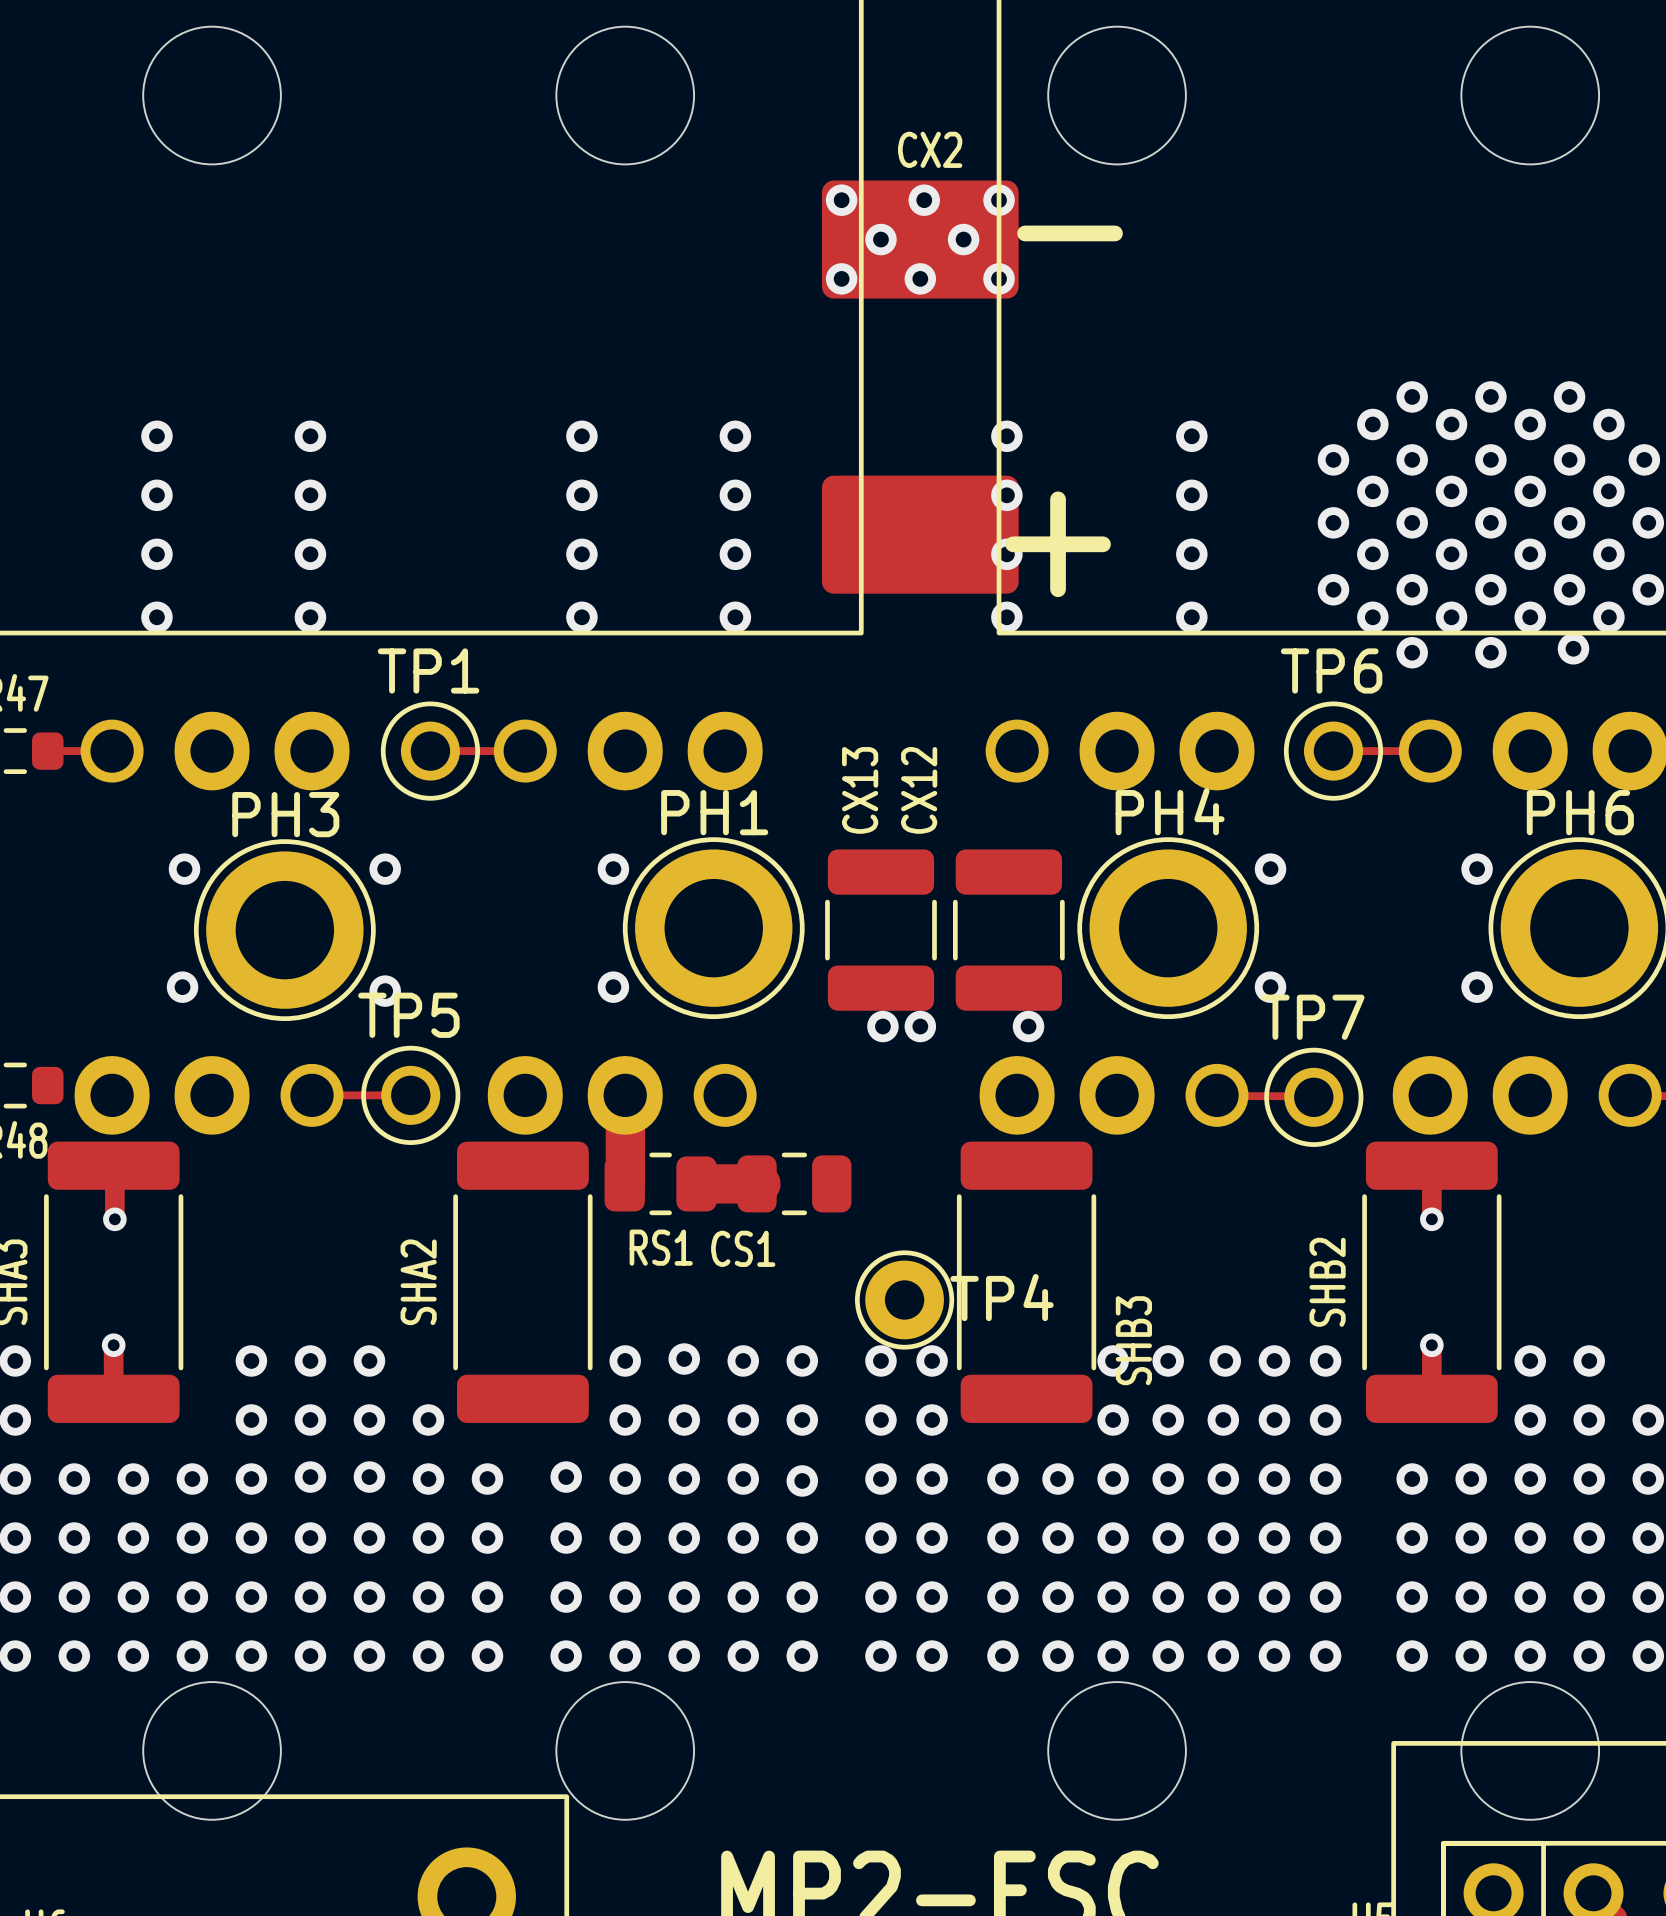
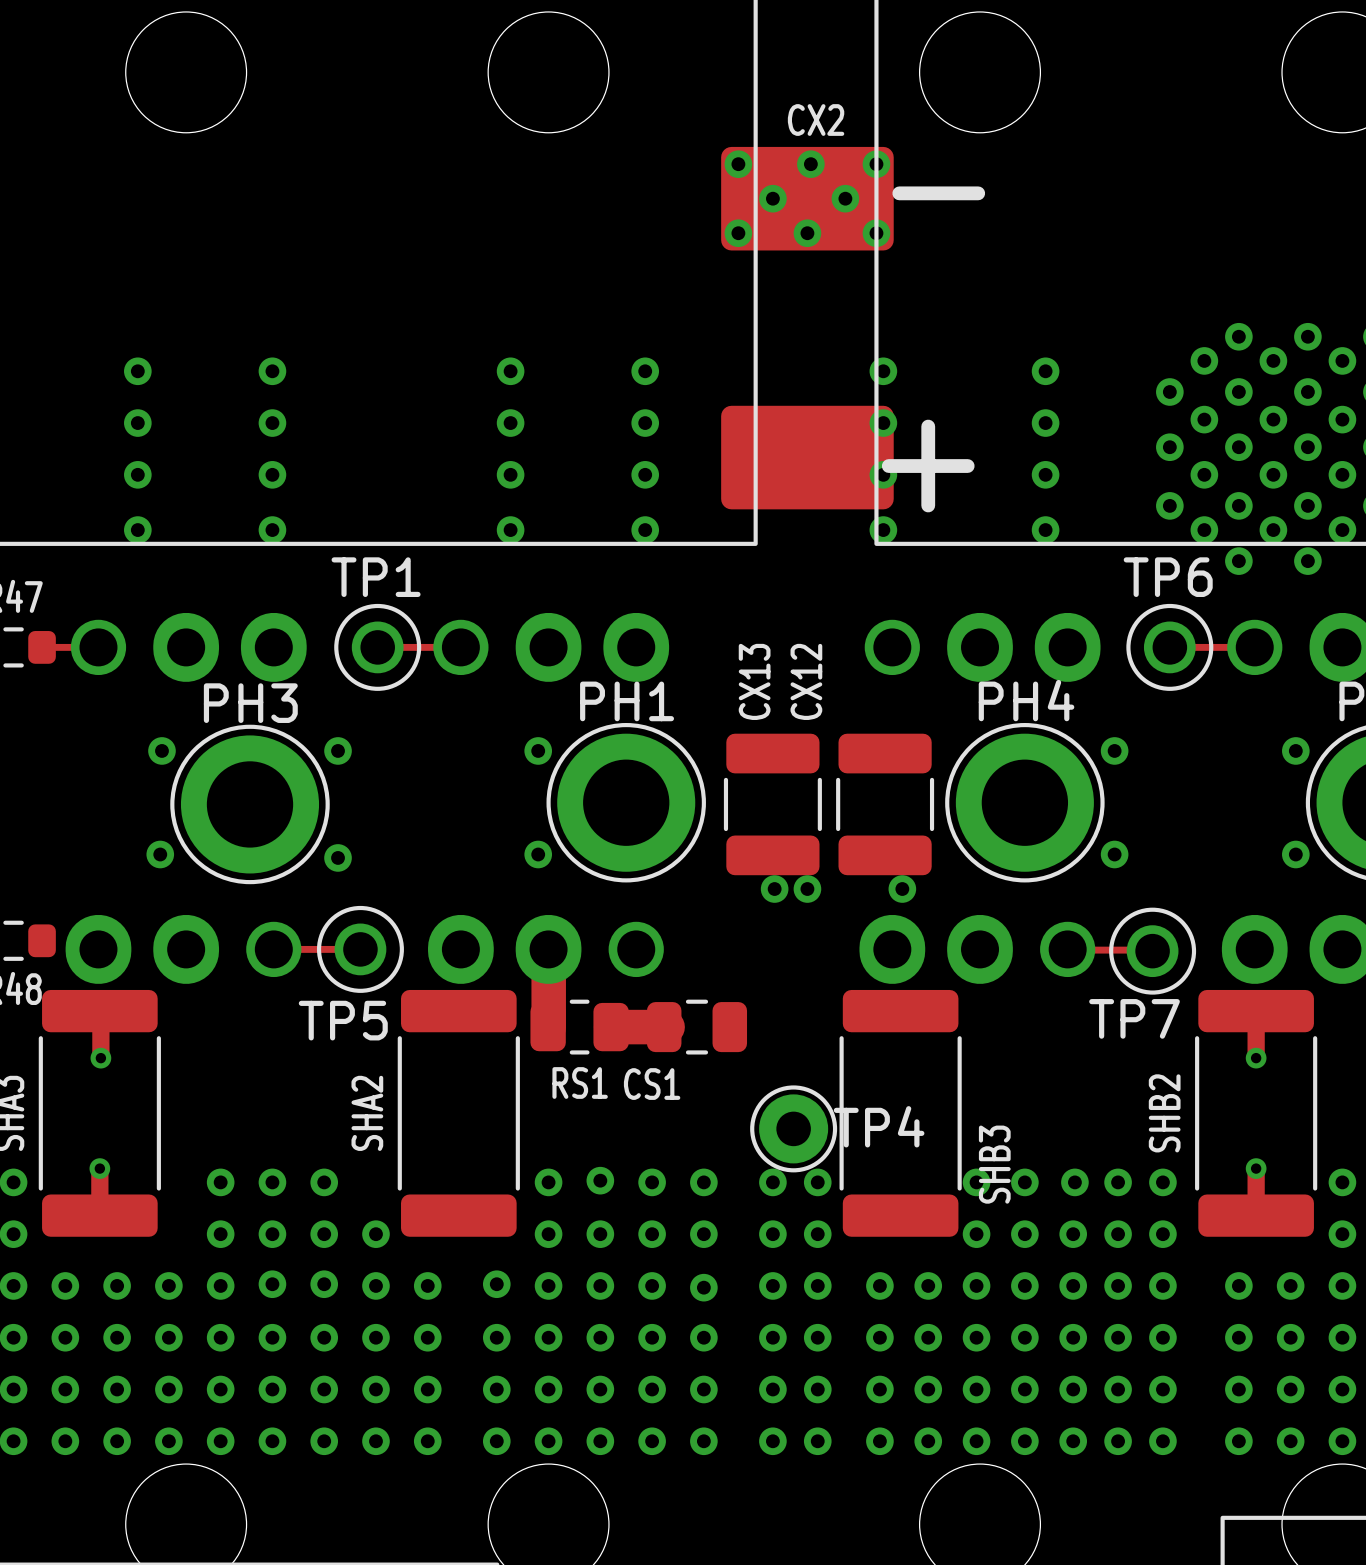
TP5 name position: TP5 (408, 1015) -> TP5 (343, 1020)
TP7 name position: TP7 (1312, 1017) -> TP7 (1134, 1018)

